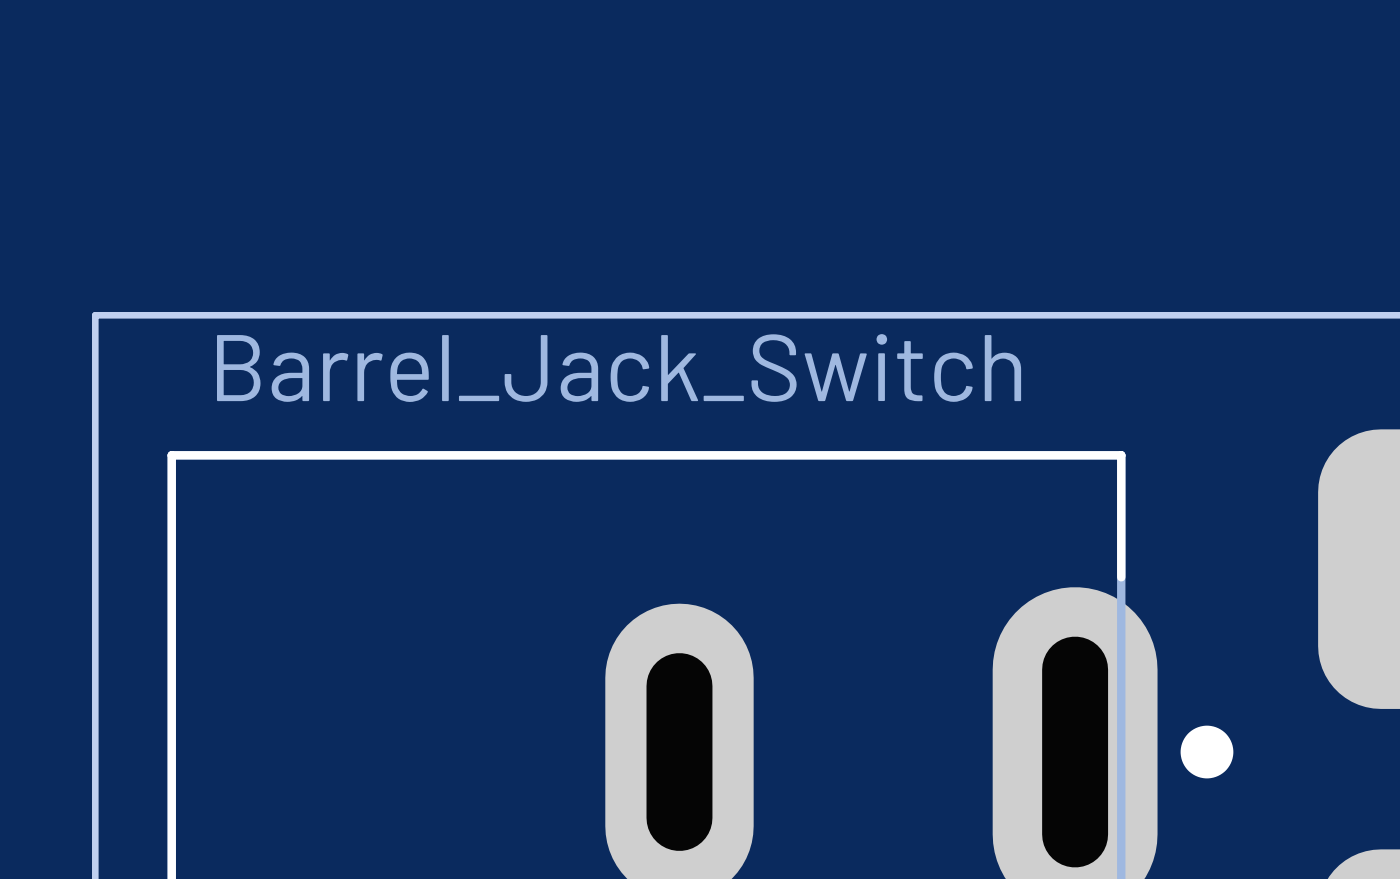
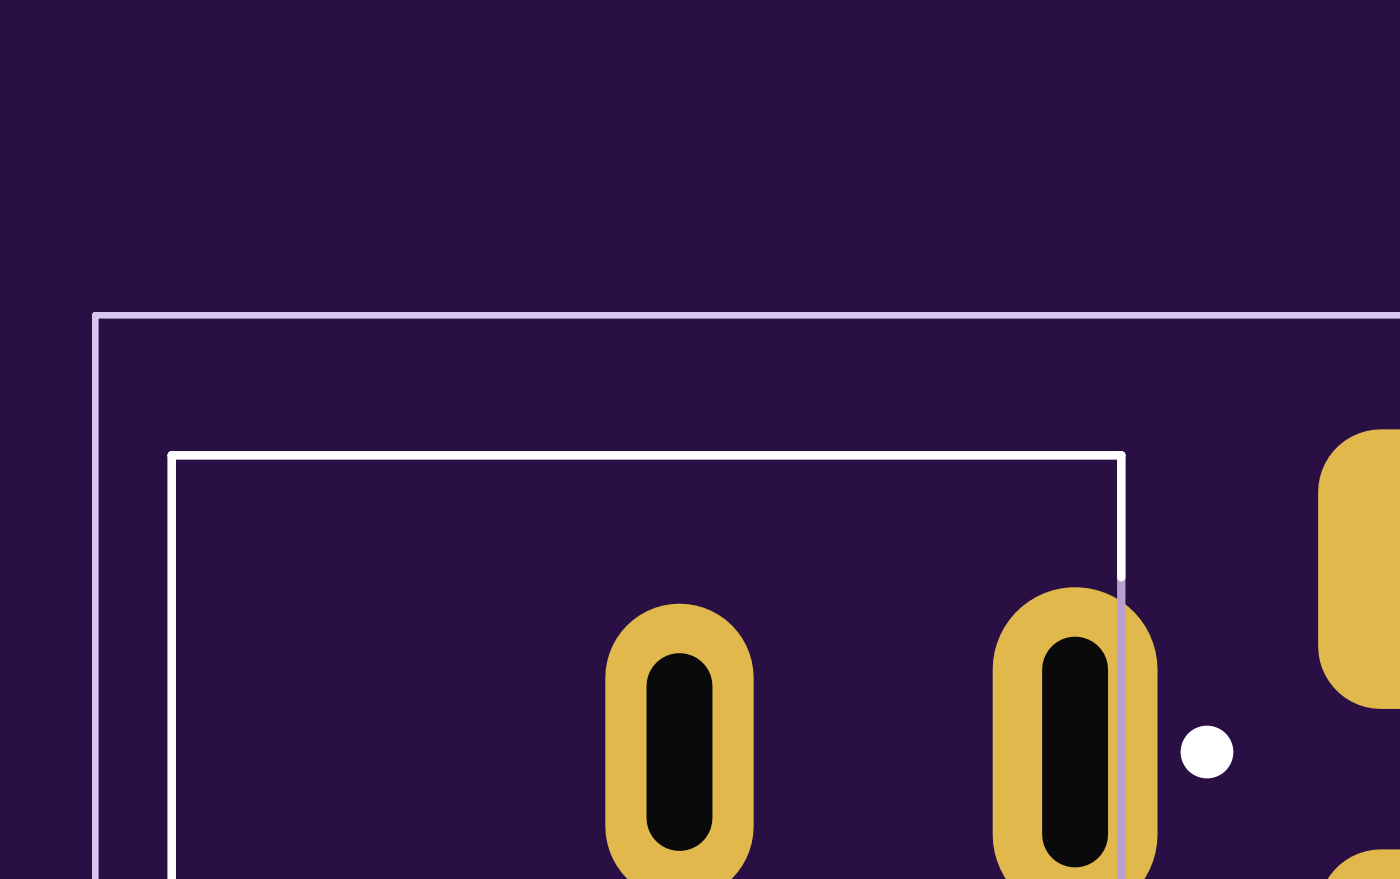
part value: Barrel_Jack_Switch (619, 368) -> none

